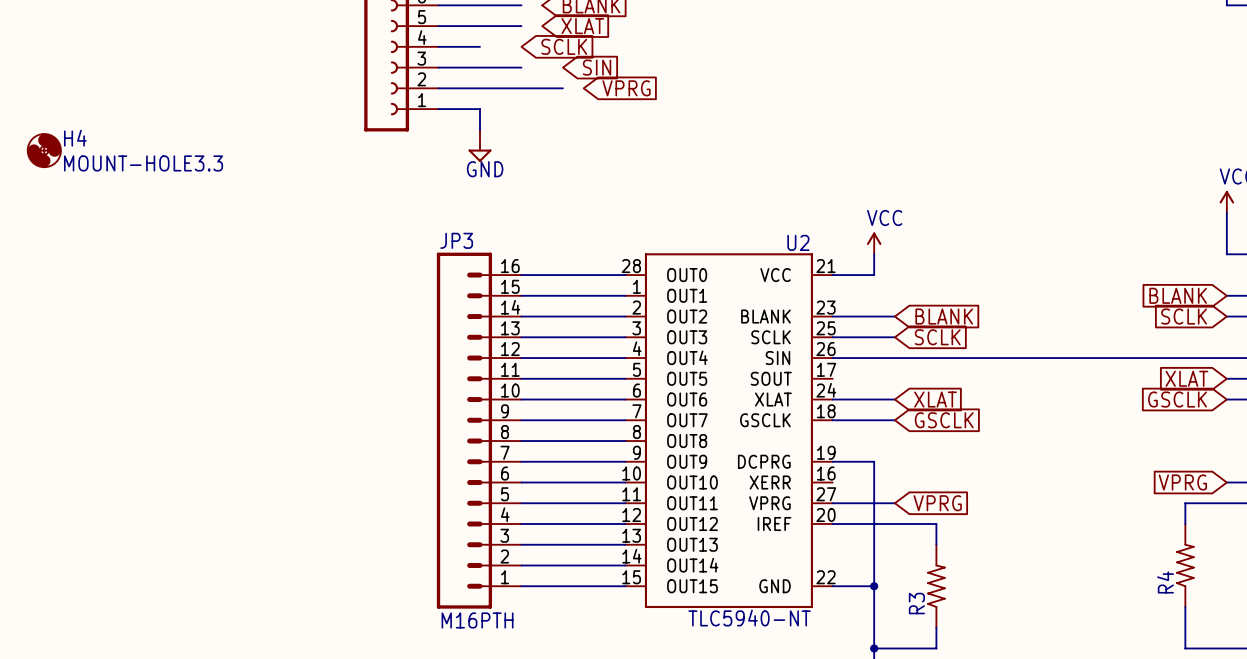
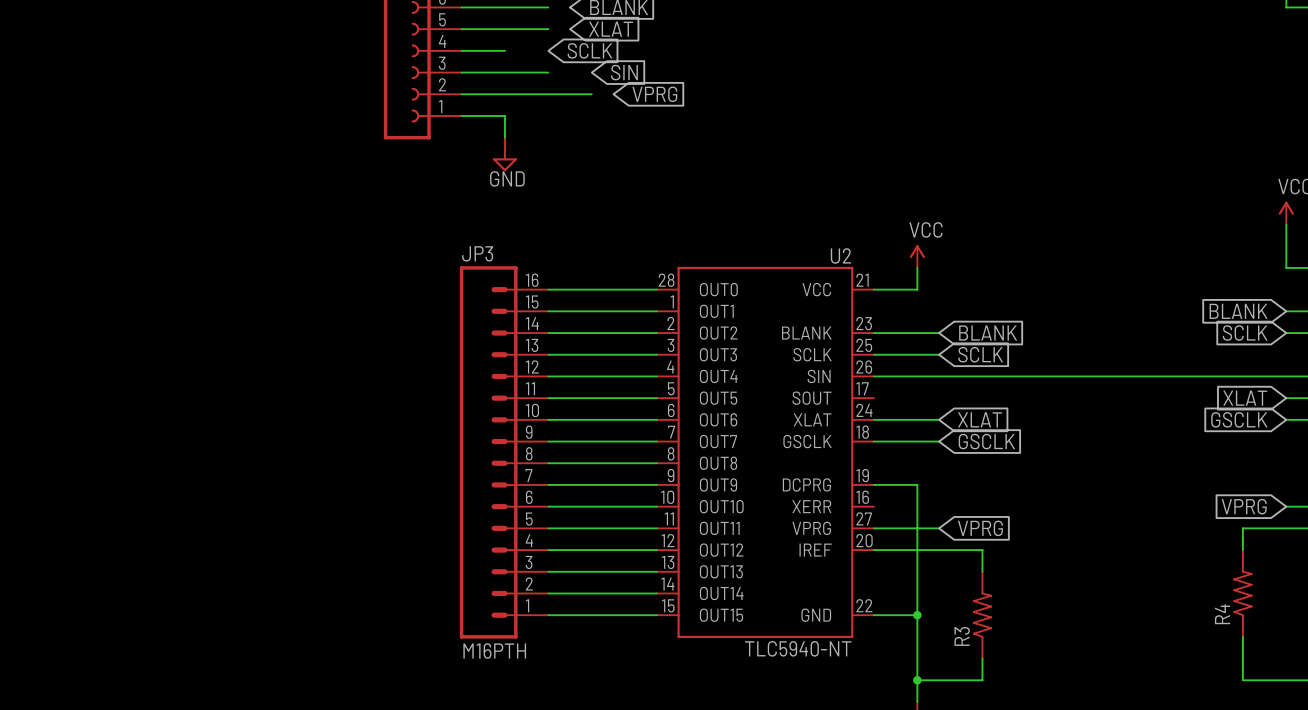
H4: MOUNT-HOLE3.3 (44, 150) -> none

